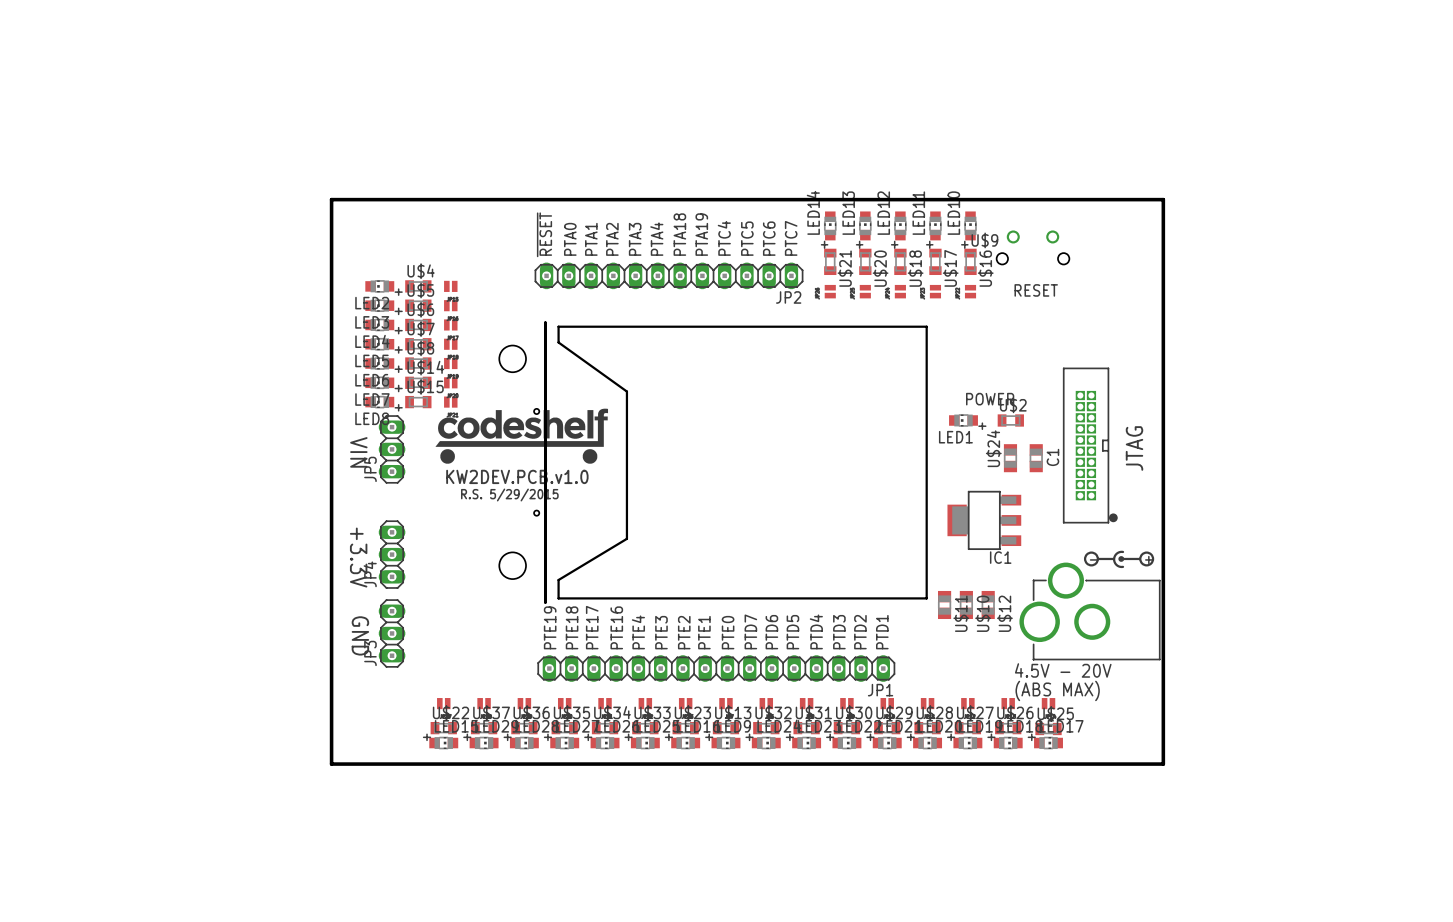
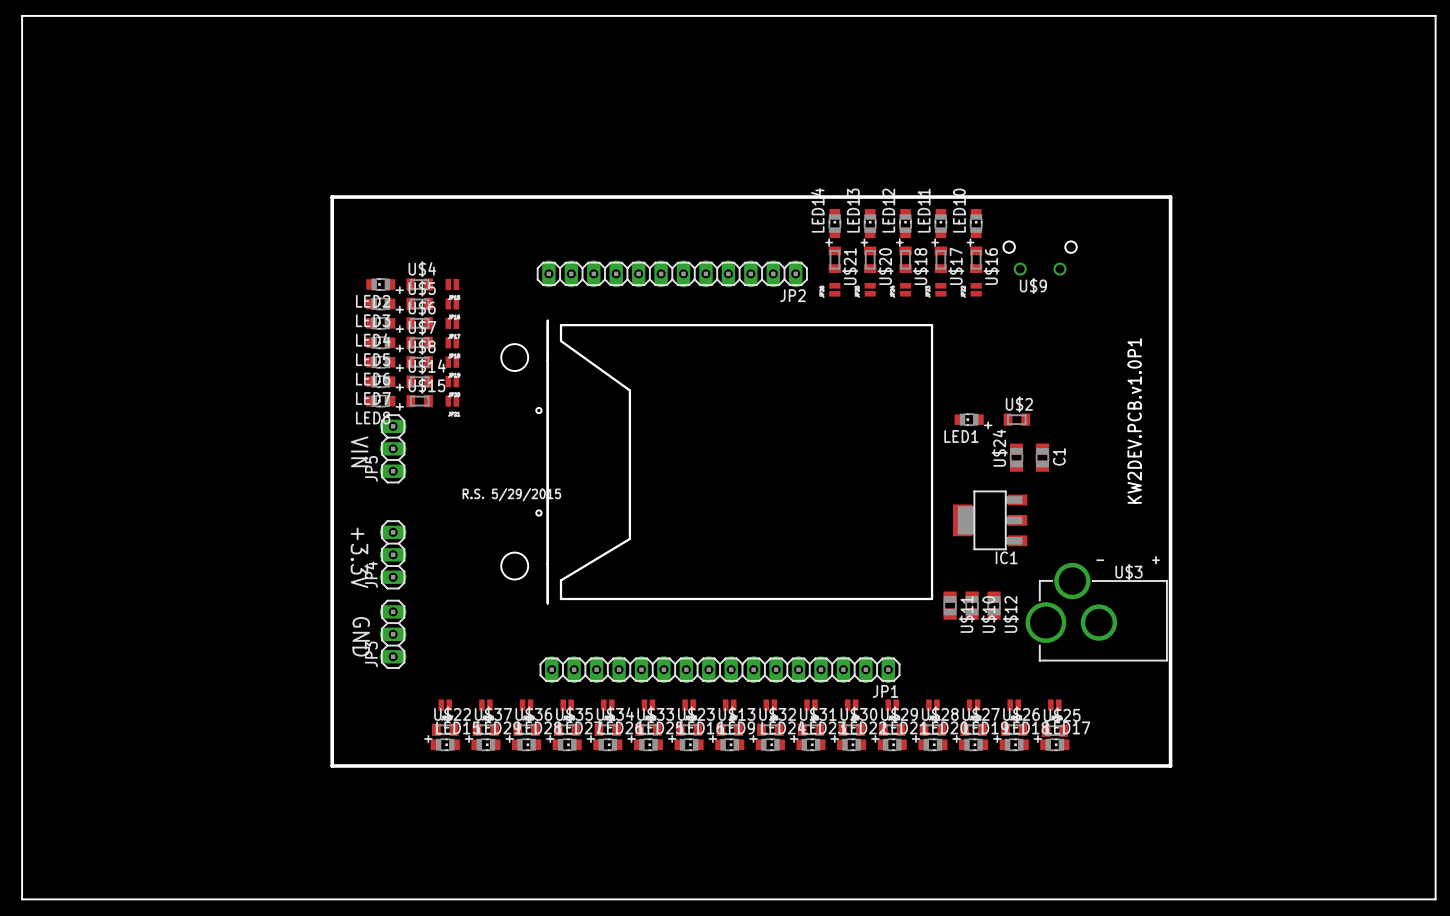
board edge: none -> (22, 15) (1435, 15) (1435, 899) (22, 899) (22, 15)
text: ~{RESET} (544, 234) -> none
text: PTA18 (679, 234) -> none
text: PTA19 (701, 234) -> none
text: PTC4 (724, 238) -> none
text: PTC5 (747, 238) -> none
text: PTC6 (769, 238) -> none
text: PTC7 (791, 238) -> none
text: PTA0 (570, 239) -> none
text: PTA1 (591, 239) -> none
text: PTA2 (612, 239) -> none
text: PTA3 (635, 239) -> none
text: PTA4 (656, 239) -> none
U$9 name position: U$9 (984, 240) -> U$9 (1033, 285)
U$9 rotation: 0° (1033, 247) -> 180° (1040, 258)
text: RESET (1036, 290) -> none
text: POWER (990, 399) -> none
drawing: [435, 408, 609, 464] -> none
text: none -> KW2DEV.PCB.v1.0P1 (1134, 420)
part: (1090, 445) -> none
text: JTAG (1134, 448) -> none
text: KW2DEV.PCB.v1.0 (517, 476) -> none
drawing: [1083, 551, 1099, 567] -> none
line: (1123, 551) (1116, 553) (1114, 559) (1116, 565) (1123, 566) -> none
drawing: [1139, 551, 1155, 567] -> none
drawing: [1118, 556, 1125, 562] -> none
line: (1098, 558) (1113, 558) -> none
line: (1121, 558) (1139, 558) -> none
U$3 name: none -> U$3 (1128, 572)
text: PTE19 (550, 627) -> none
text: PTE18 (572, 627) -> none
text: PTE17 (592, 627) -> none
text: PTE16 (616, 627) -> none
text: PTD7 (750, 631) -> none
text: PTD4 (816, 631) -> none
text: PTE4 (638, 632) -> none
text: PTE3 (661, 632) -> none
text: PTE2 (684, 632) -> none
text: PTE1 (704, 632) -> none
text: PTE0 (728, 632) -> none
text: PTD6 (771, 632) -> none
text: PTD5 (792, 632) -> none
text: PTD3 (839, 632) -> none
text: PTD2 (860, 632) -> none
text: PTD1 (882, 632) -> none
text: 4.5V - 20V (1063, 670) -> none
text: (ABS MAX) (1057, 690) -> none

